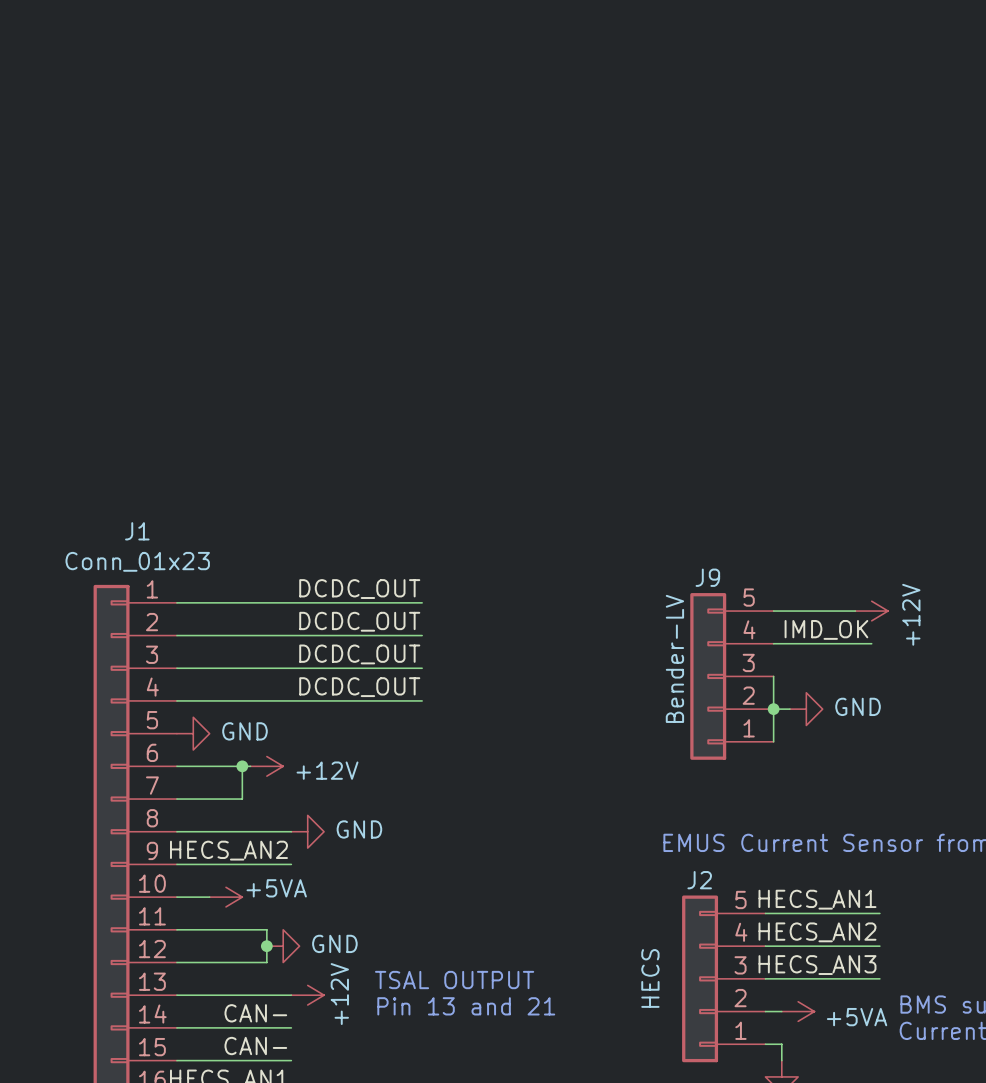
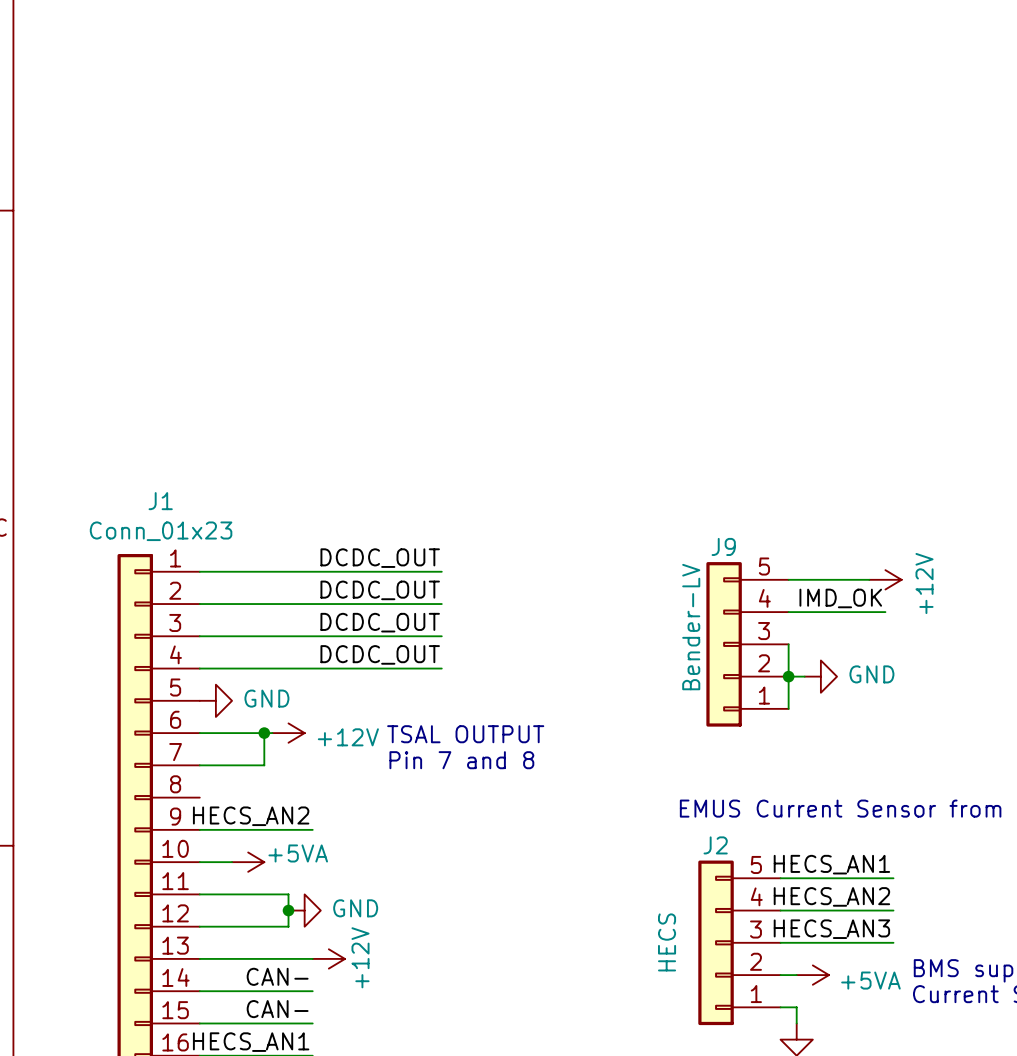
text: none -> Pin 7 and 8 (461, 760)
wire: (176, 831) (291, 831) -> none
power symbol: GND (307, 831) -> none
text position: TSAL OUTPUT (454, 980) -> TSAL OUTPUT (465, 734)
text: Pin 13 and 21 (466, 1006) -> none

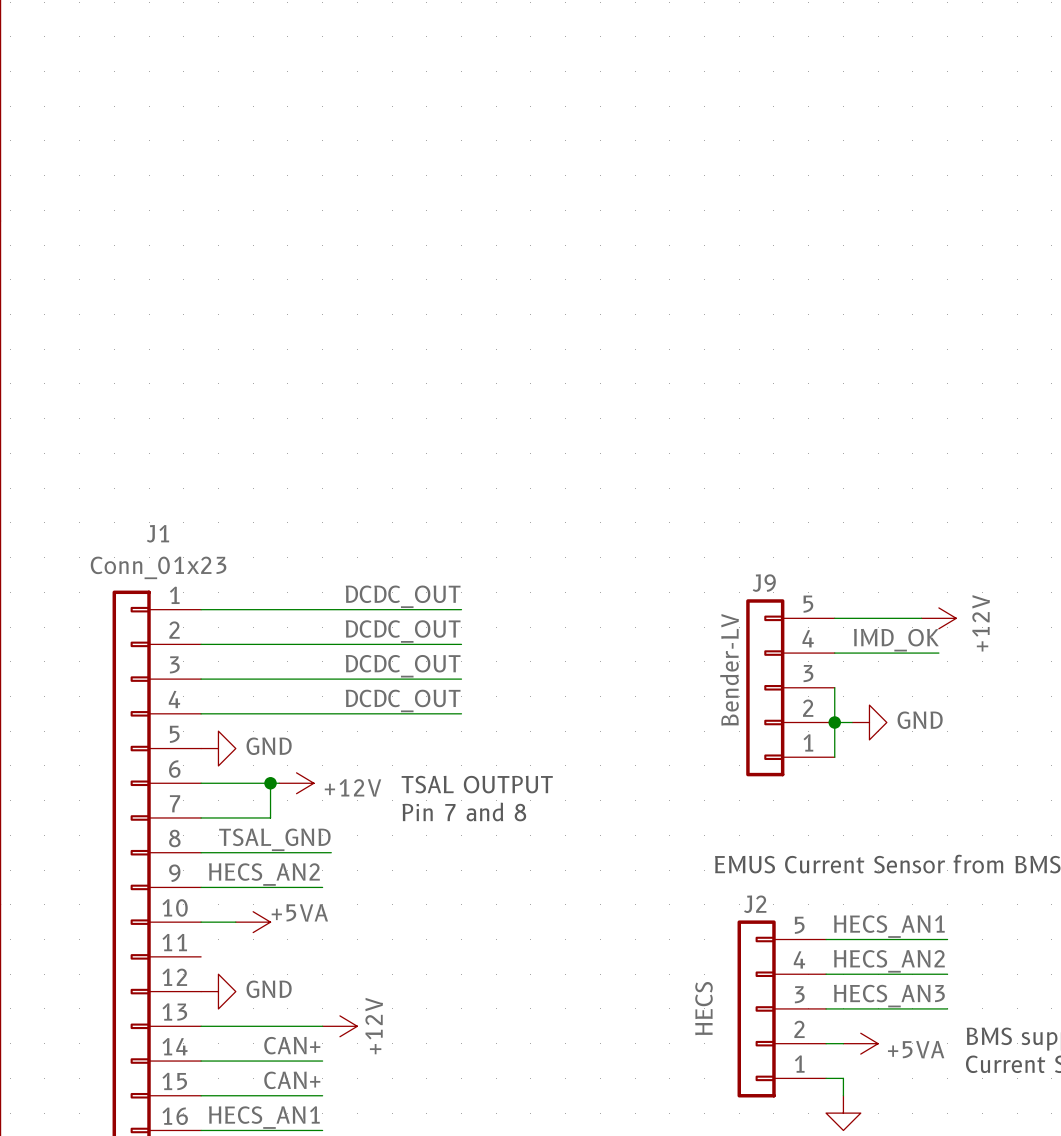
label: none -> TSAL_GND (274, 839)
wire: none -> (201, 852) (331, 852)
wire: (199, 894) (288, 894) (288, 926) (199, 926) -> none
junction: (288, 910) -> none
power symbol position: GND (304, 910) -> GND (218, 991)
label: CAN- (277, 976) -> CAN+ (292, 1045)
label: CAN- (277, 1009) -> CAN+ (292, 1080)

